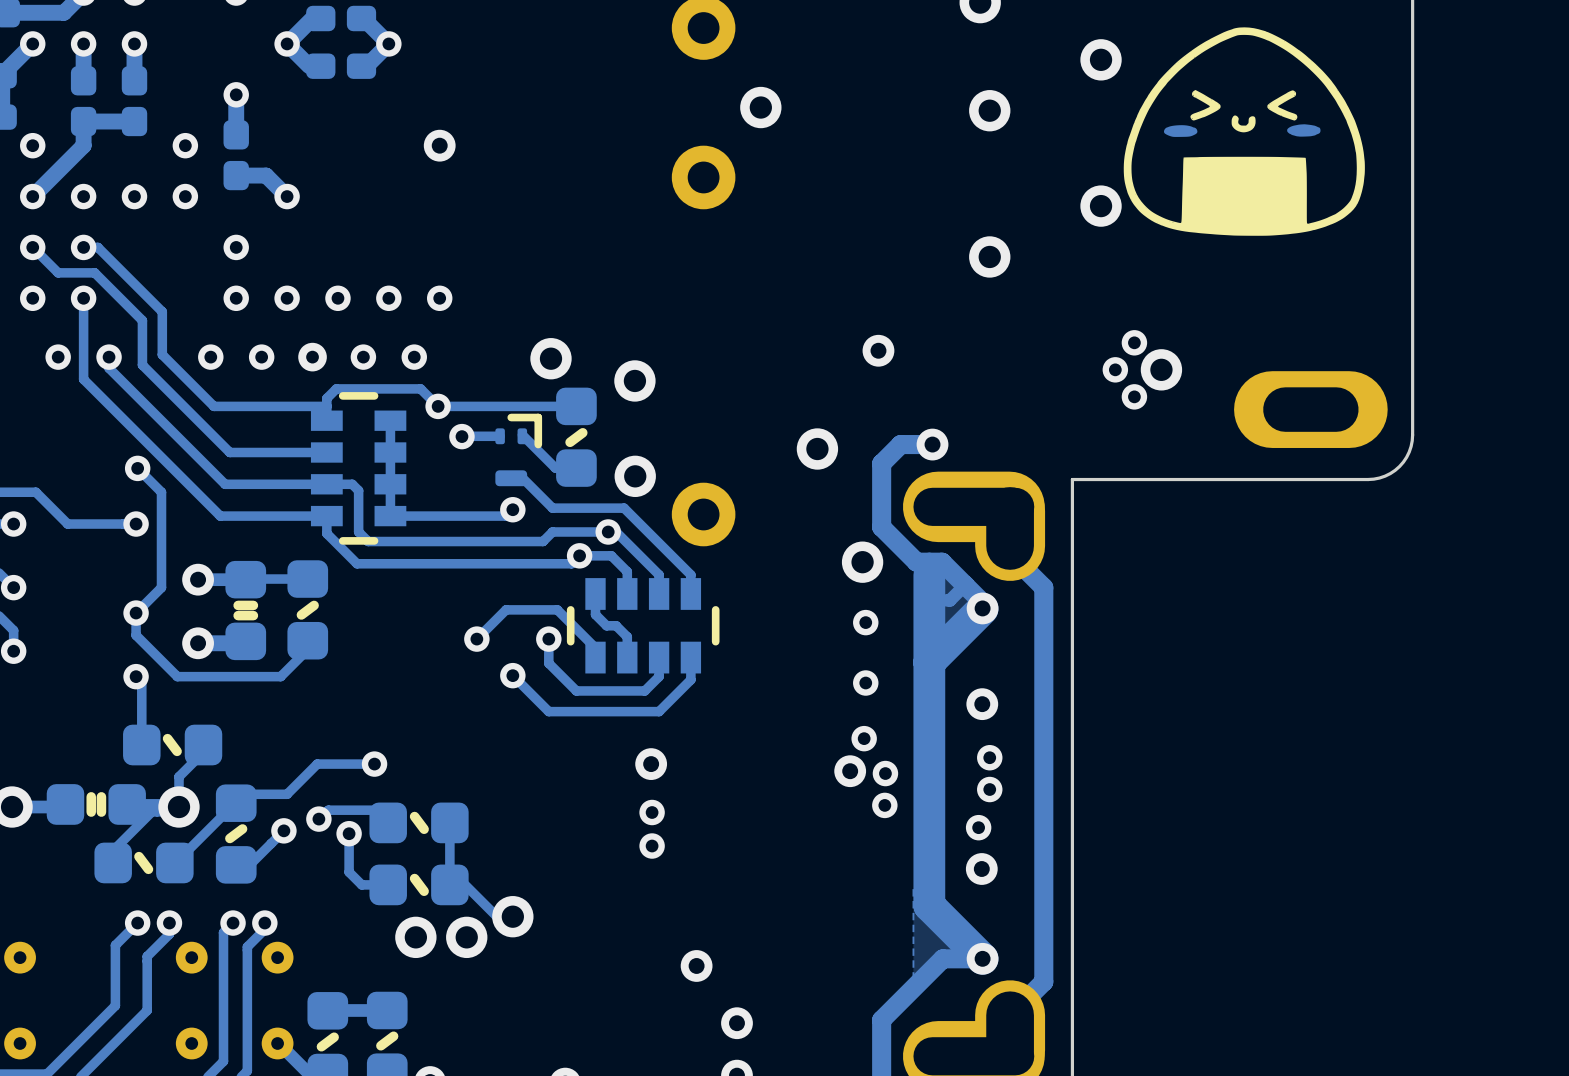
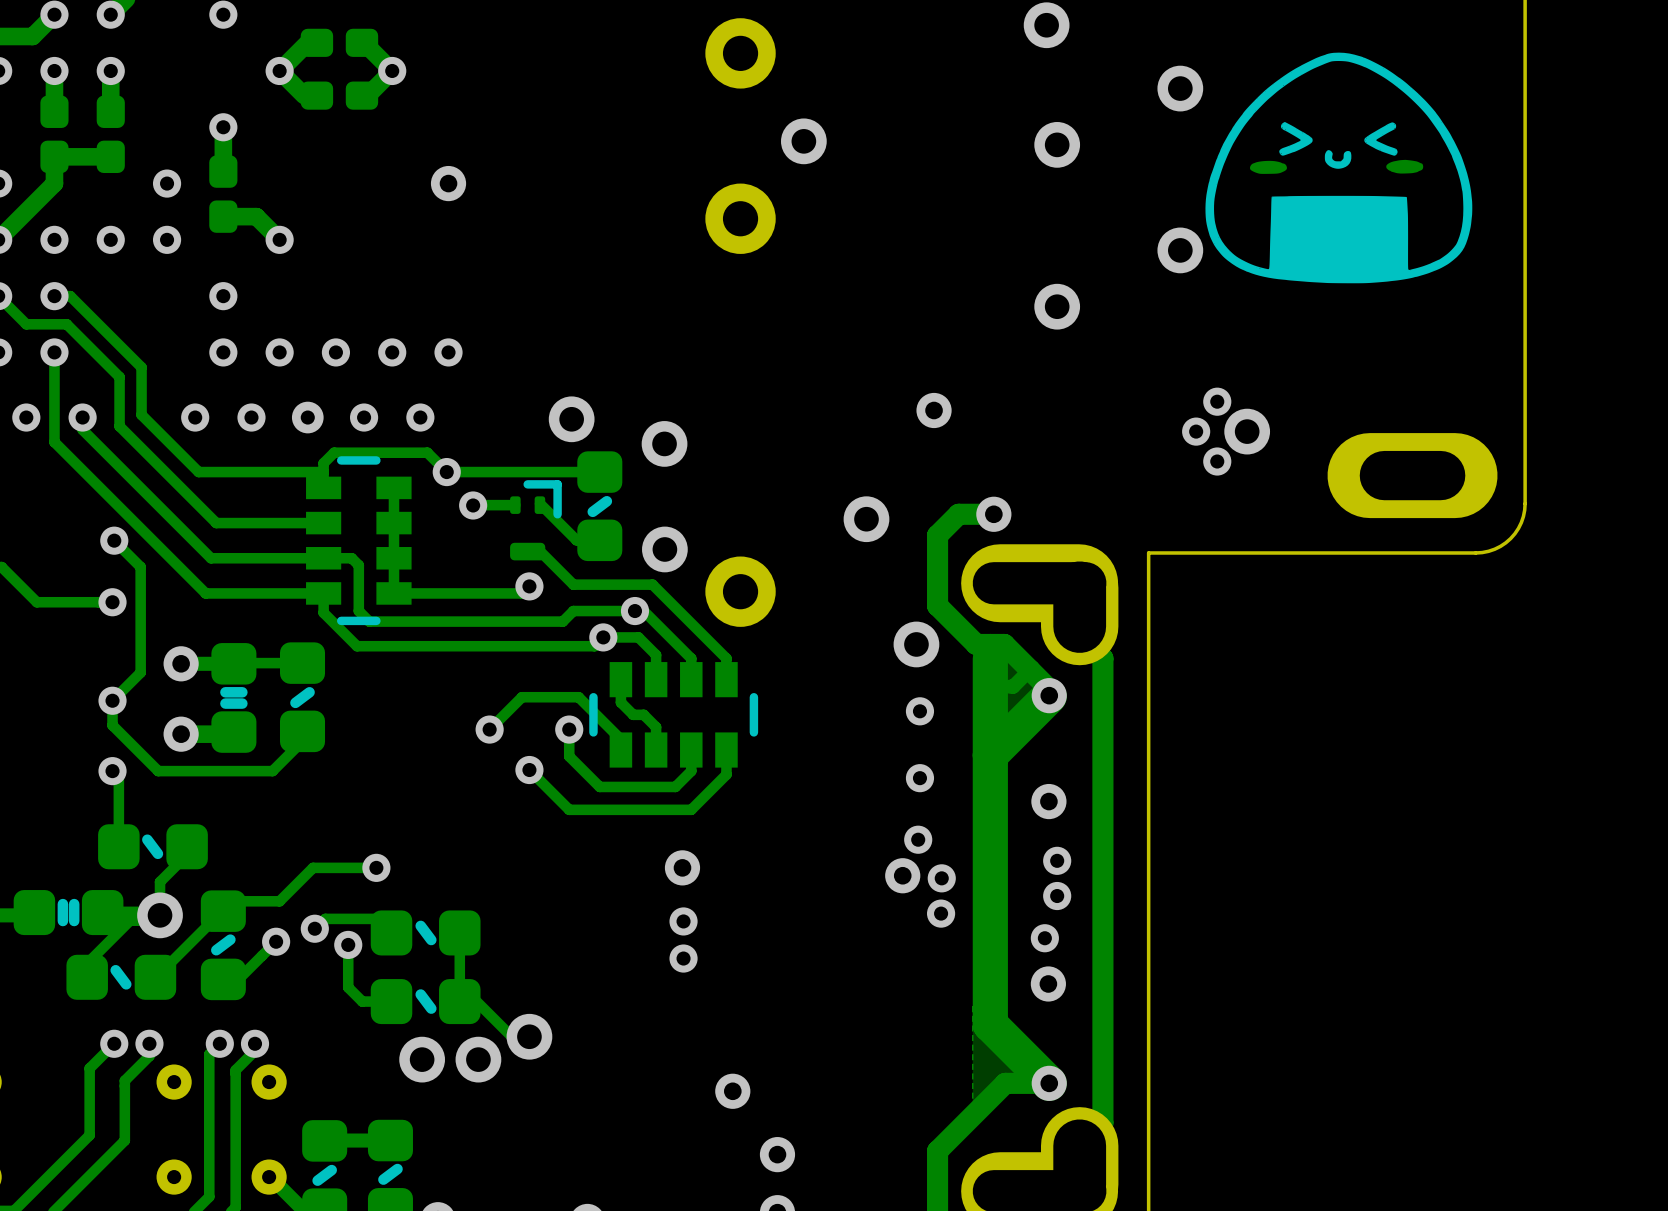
track: (1031, 574) (1043, 587) (1043, 981) (1031, 994) -> (1102, 658) (1102, 1122)

